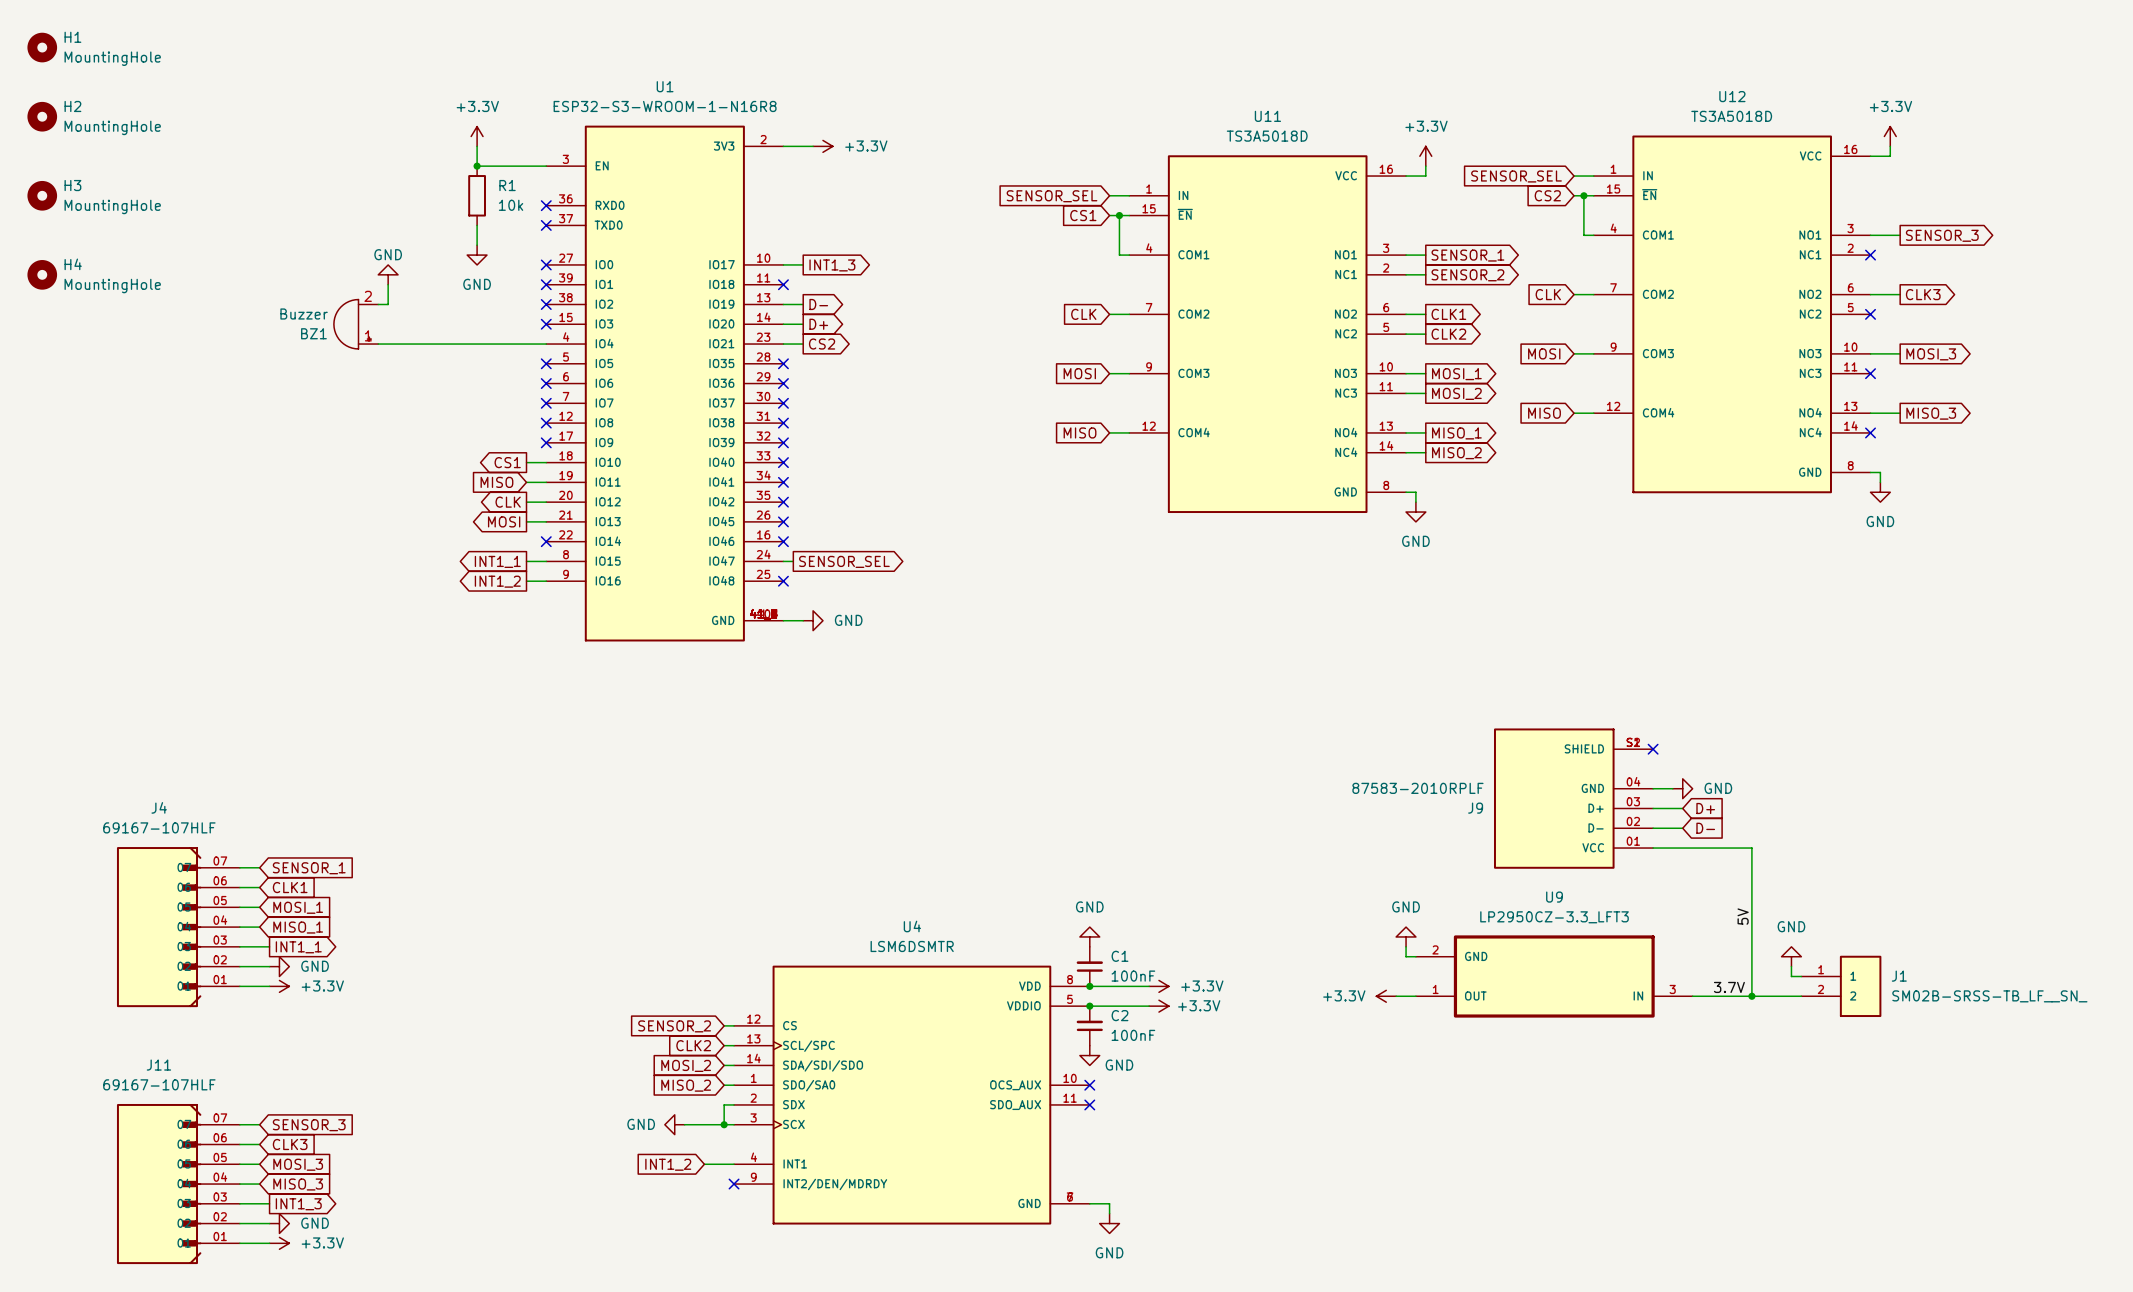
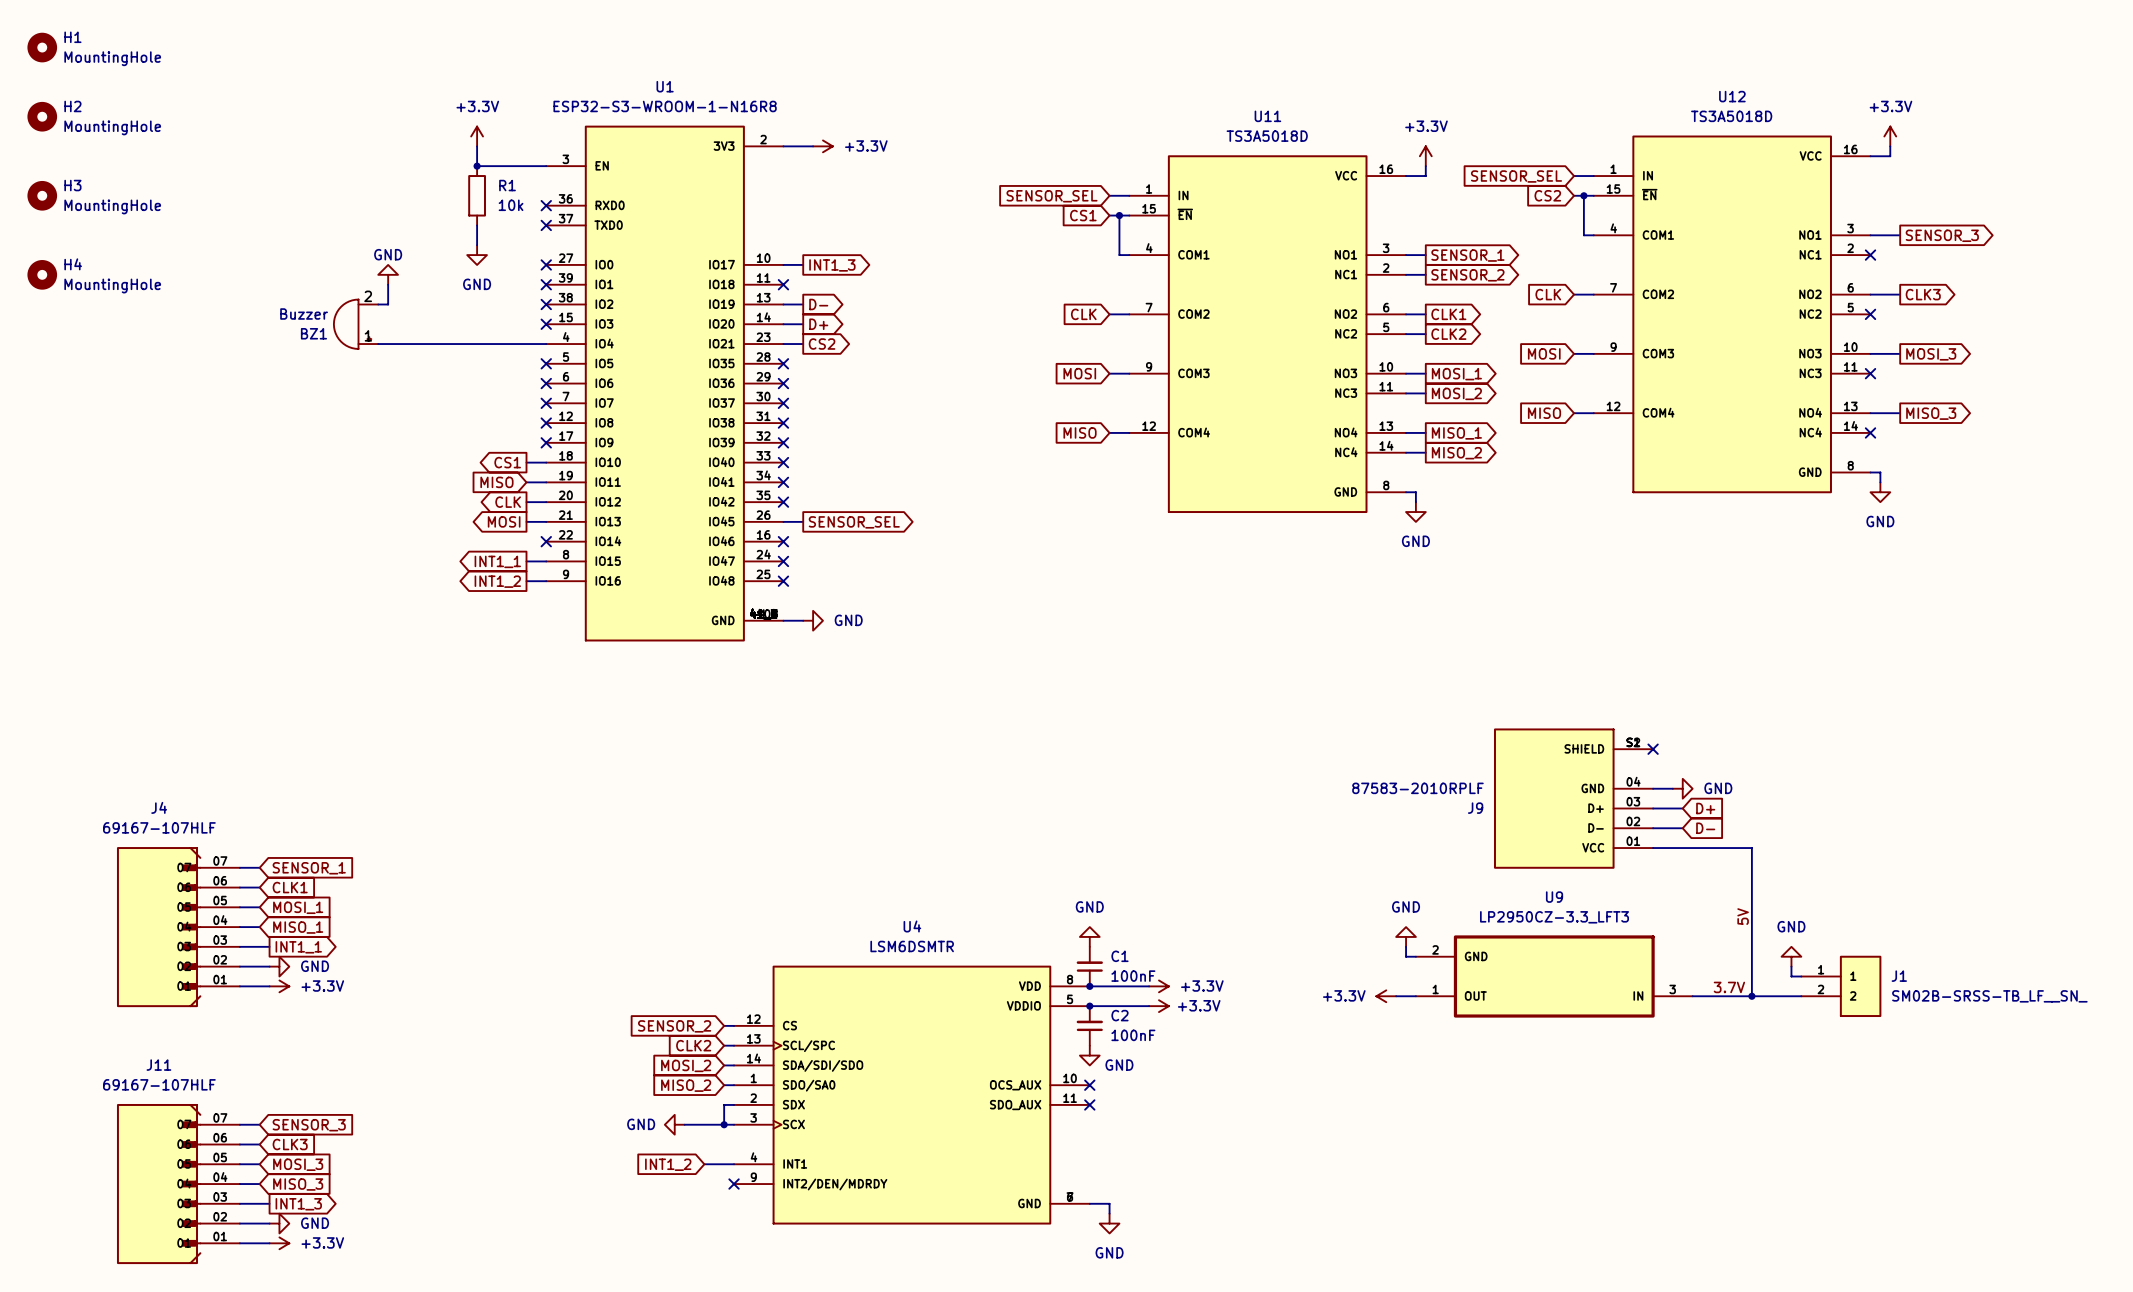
wire: none -> (783, 521) (803, 521)
no-connect mark position: (783, 521) -> (783, 561)
wire: (783, 561) (793, 561) -> none
global label position: SENSOR_SEL (844, 561) -> SENSOR_SEL (854, 522)

